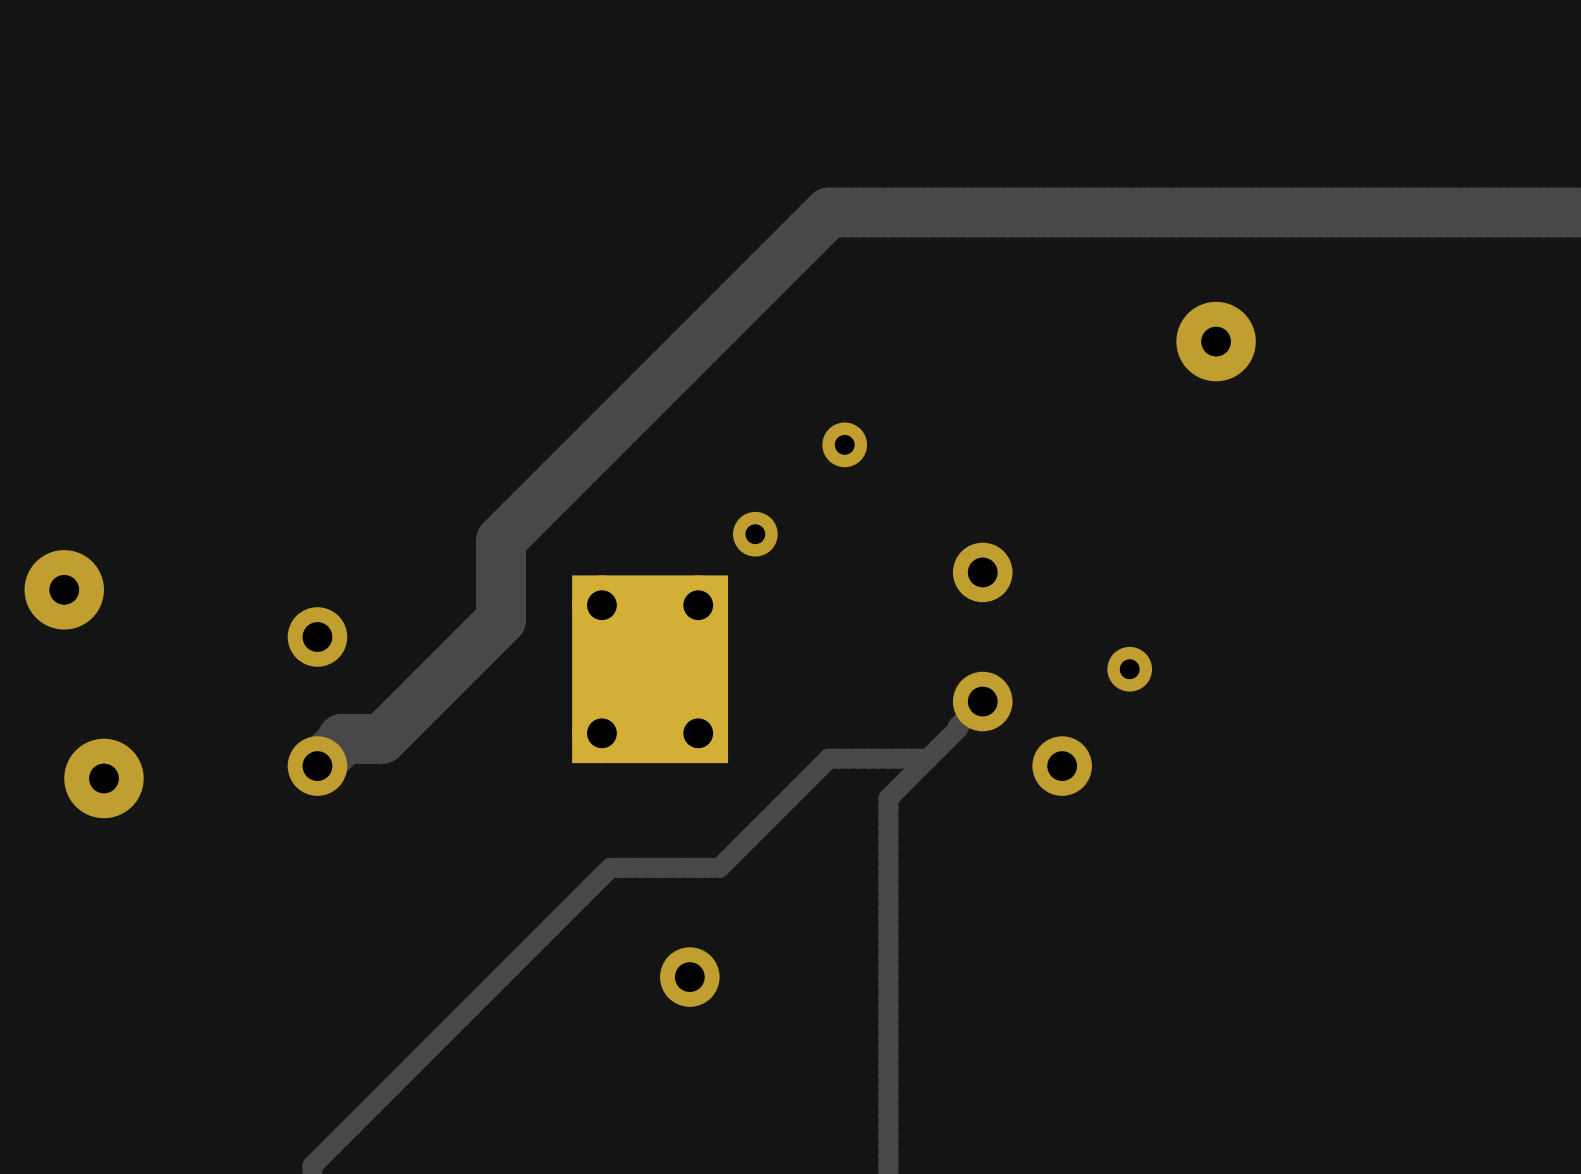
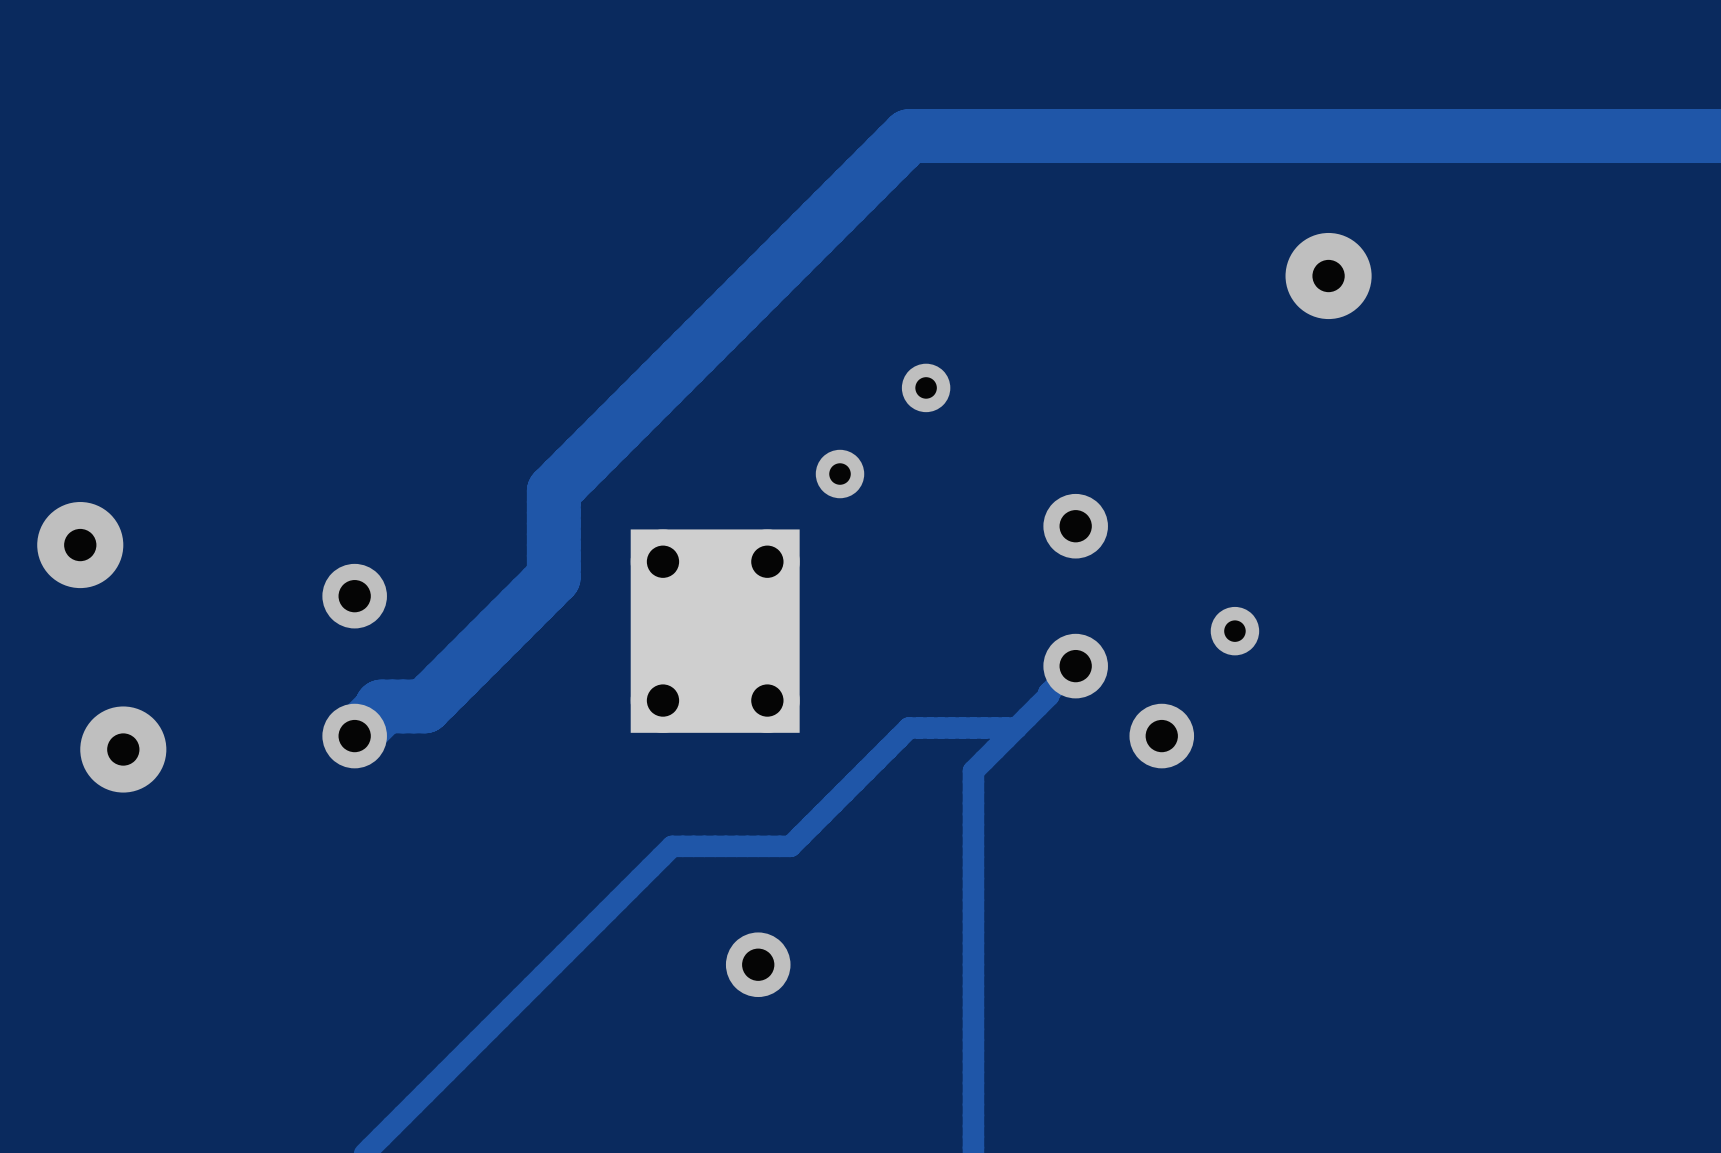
via position: (755, 534) -> (840, 474)

